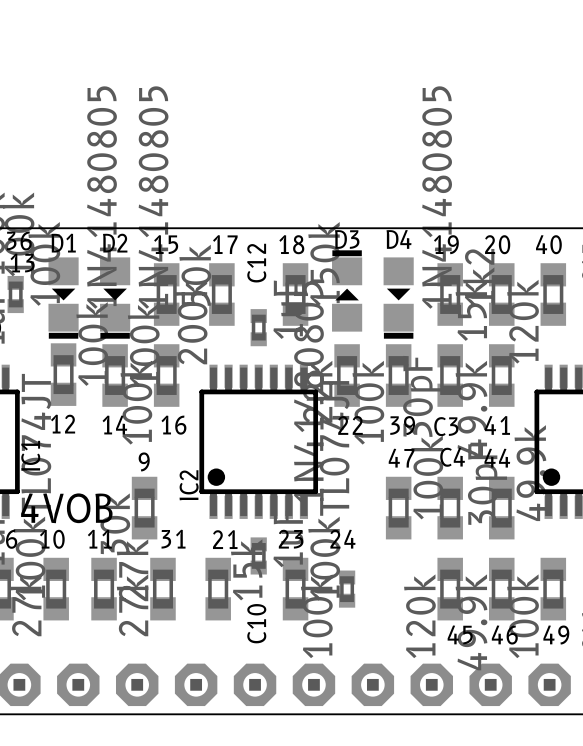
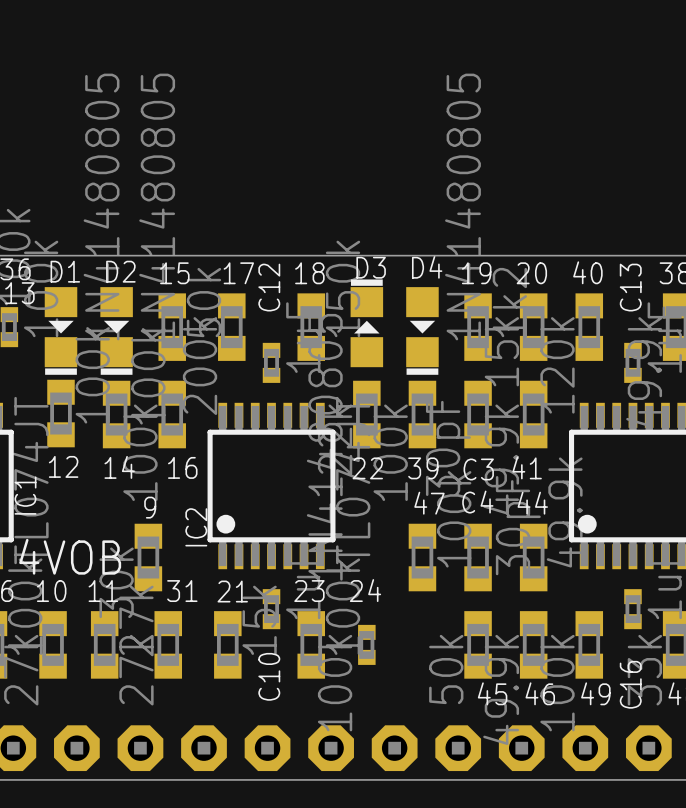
45 value: 120k (419, 616) -> 50k (446, 669)

